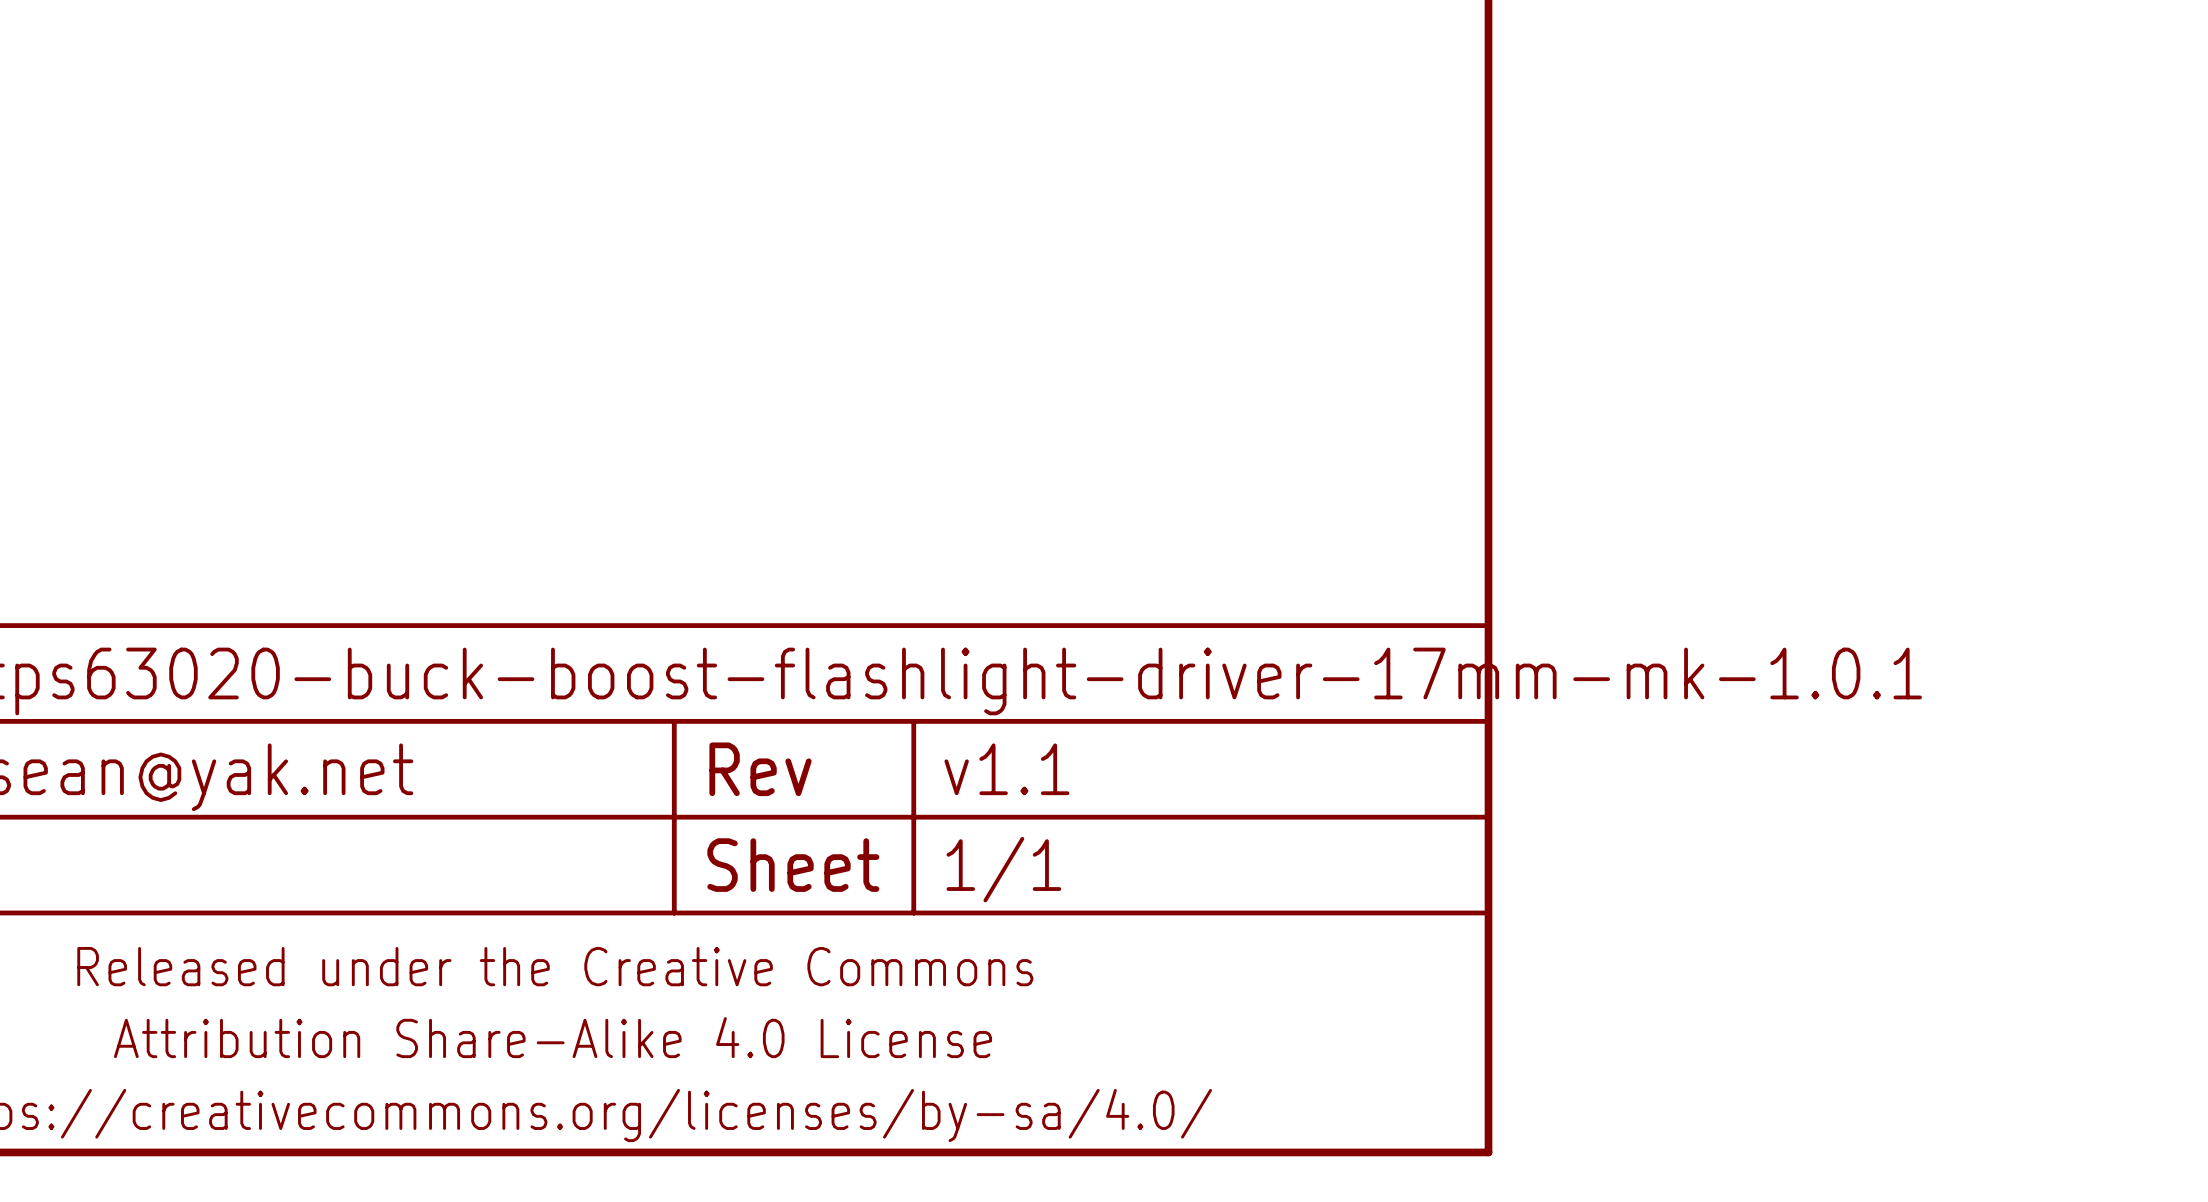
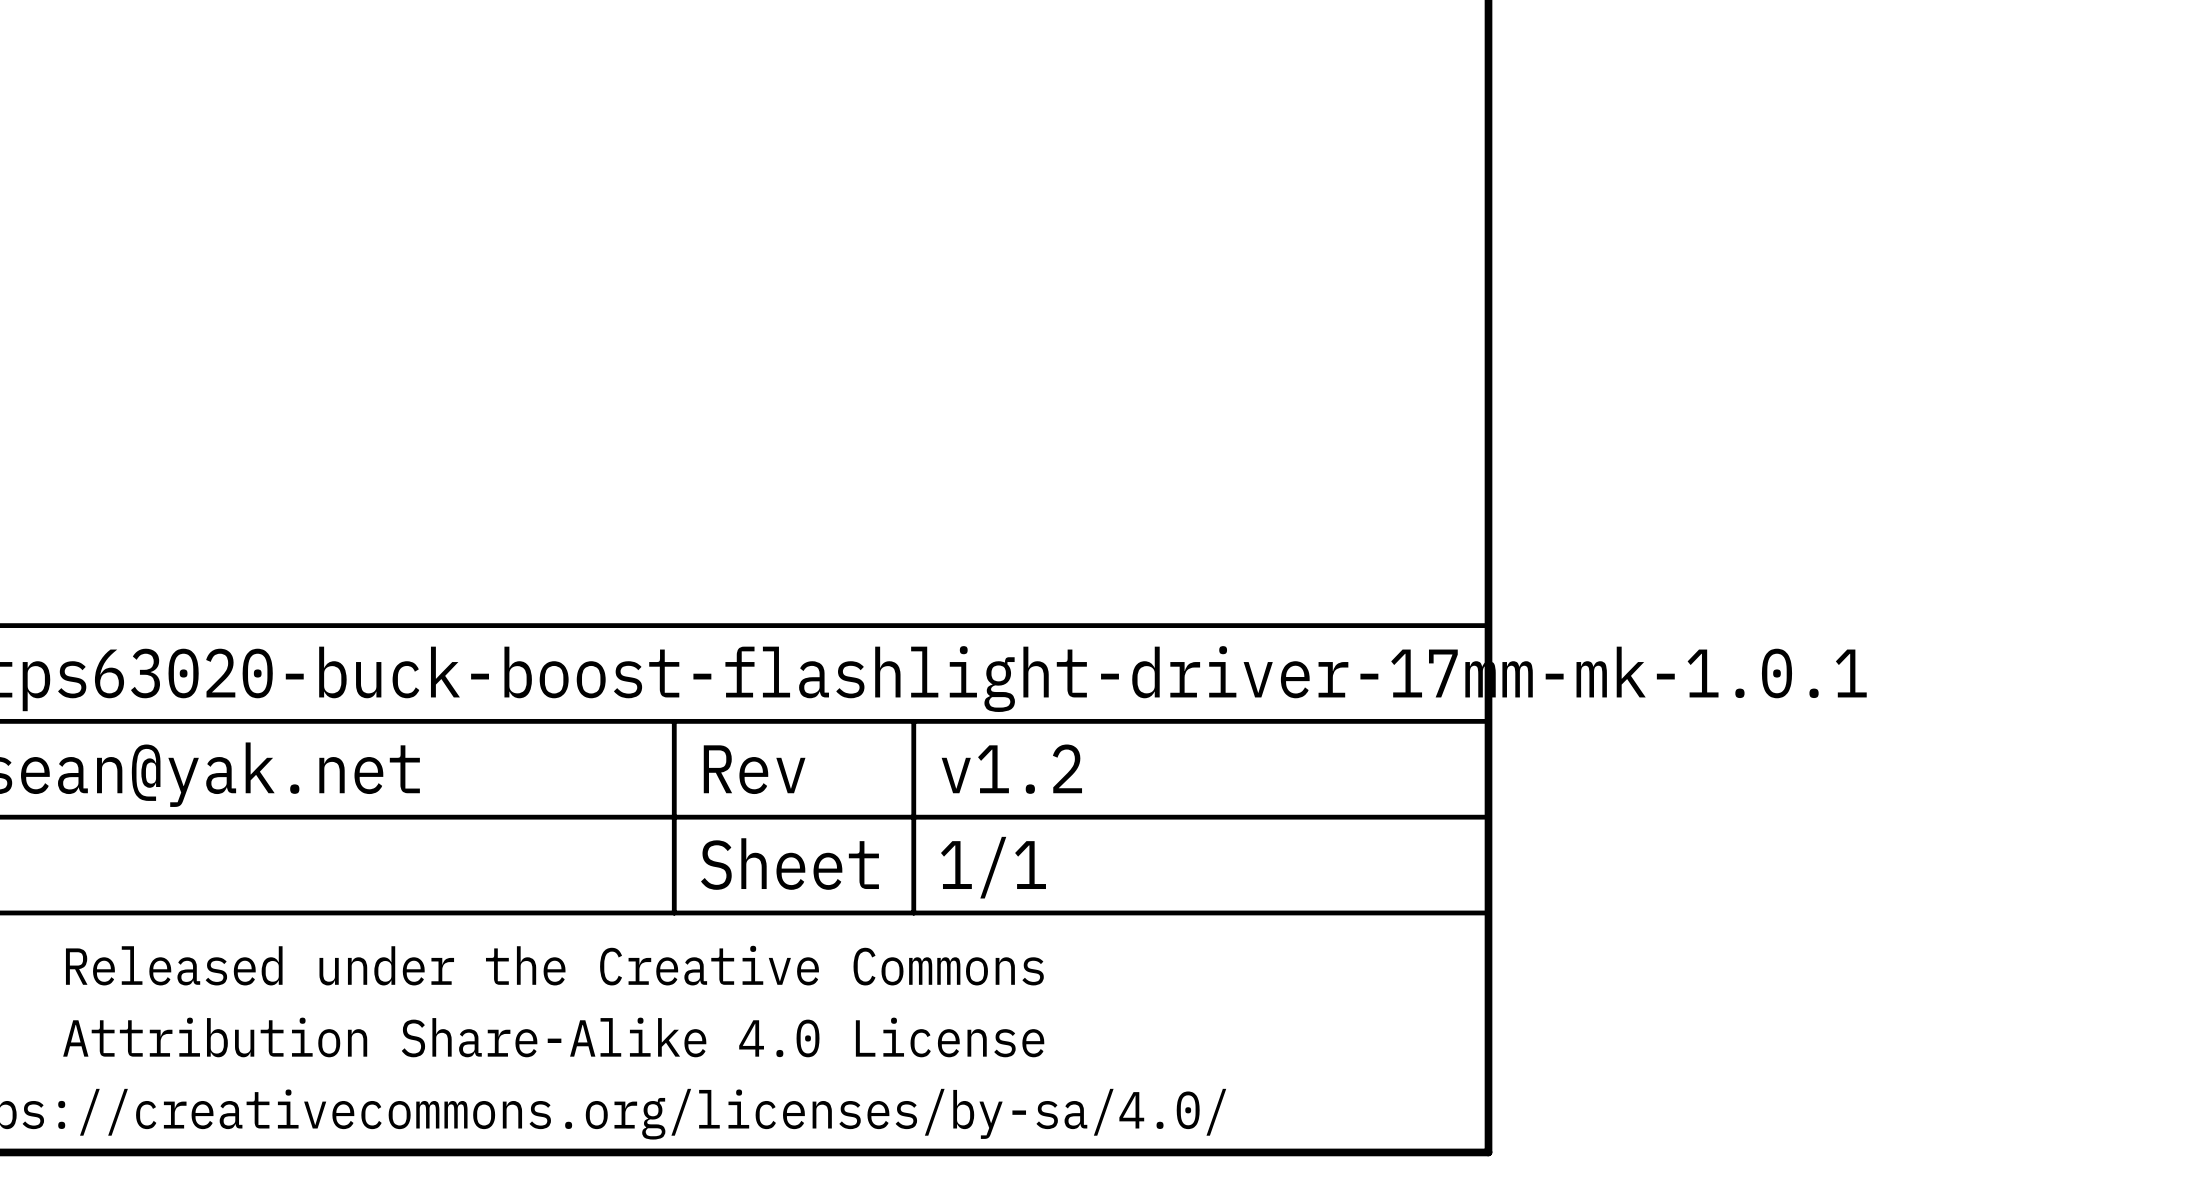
part text: v1.1 (1006, 769) -> v1.2 (1011, 769)

